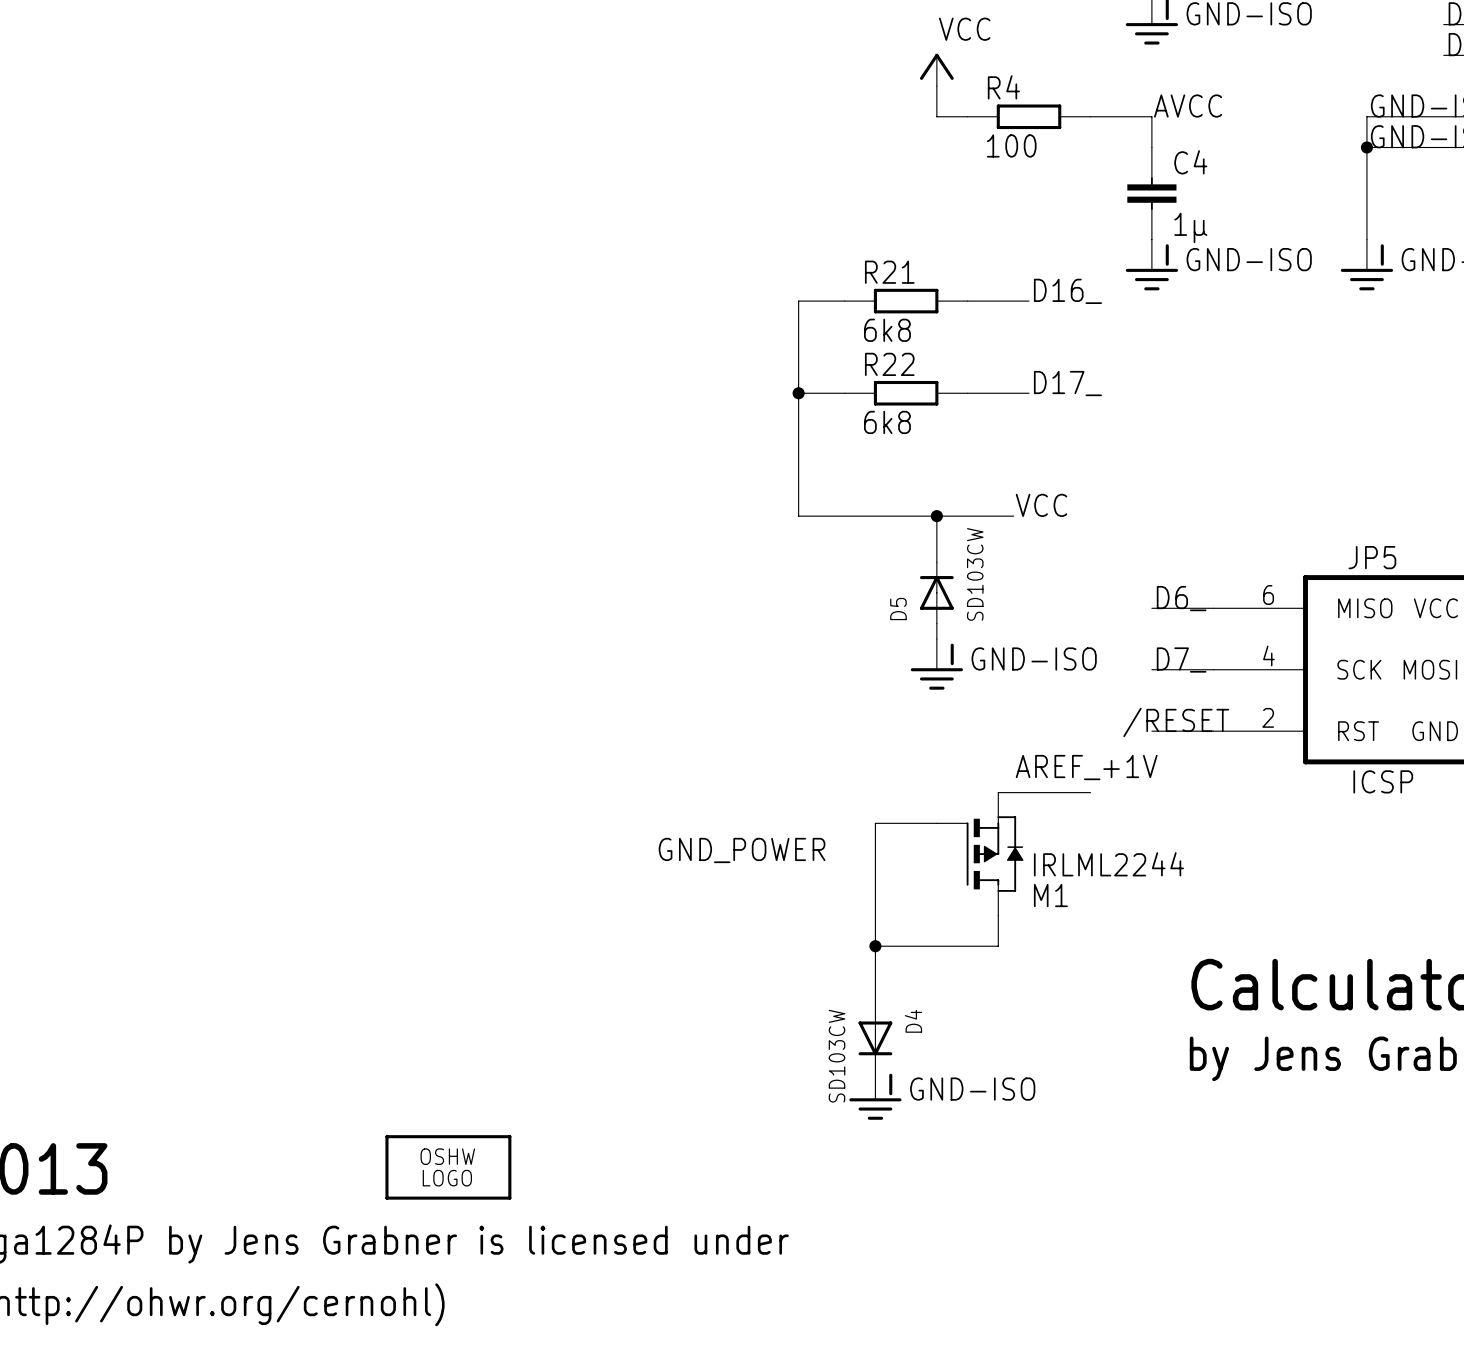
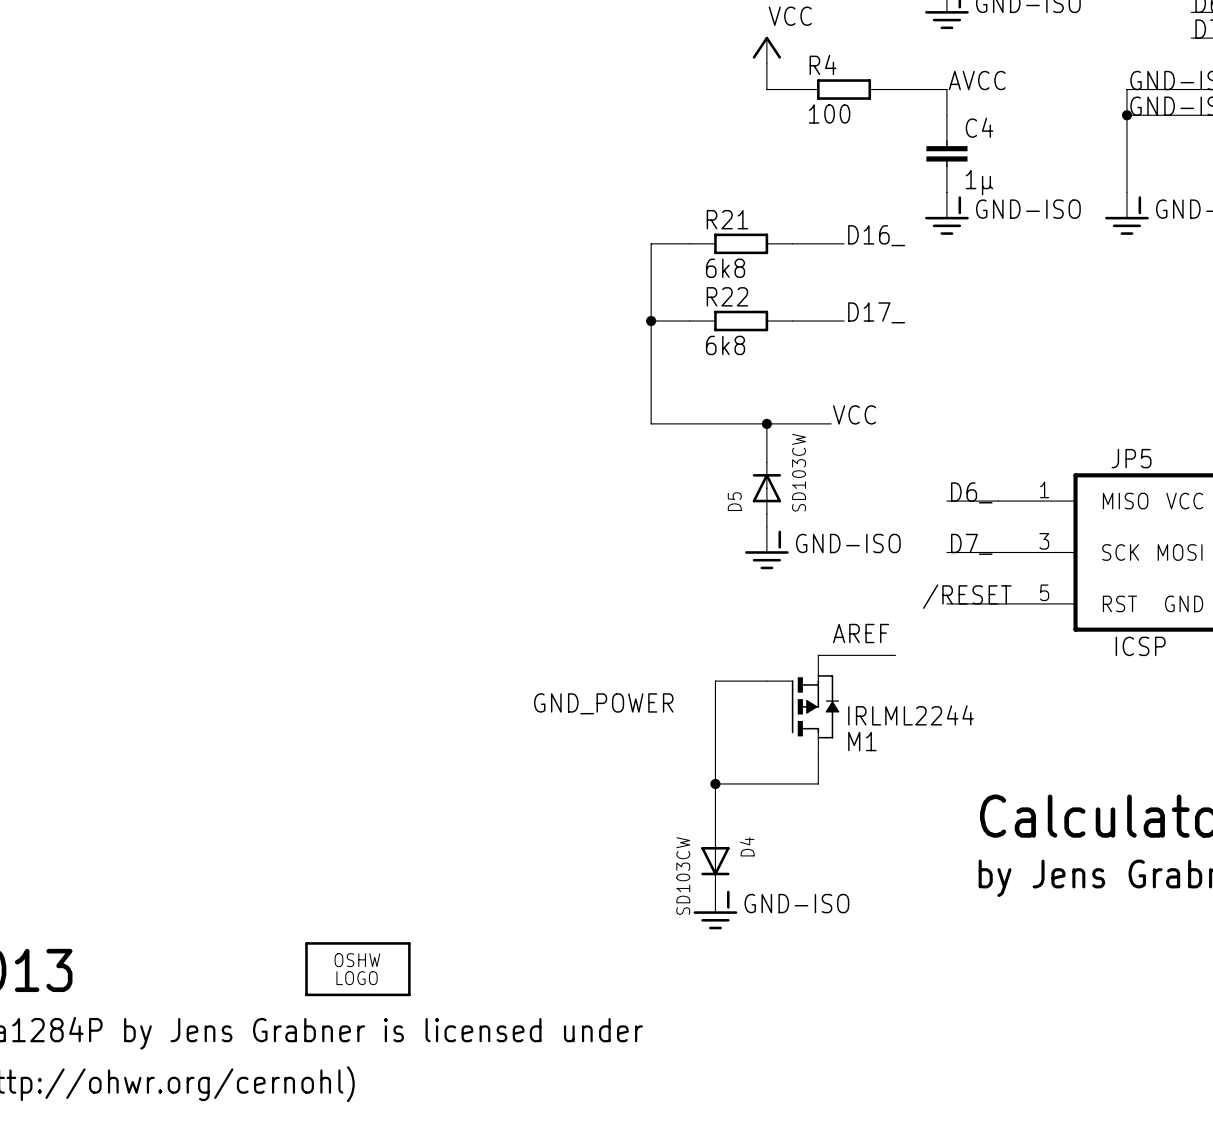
JP5 pin number: 6 (1268, 594) -> 1 (1044, 489)
JP5 pin number: 4 (1268, 655) -> 3 (1044, 541)
JP5 pin number: 2 (1268, 717) -> 5 (1044, 592)
label: AREF_+1V (1086, 767) -> AREF (861, 633)

